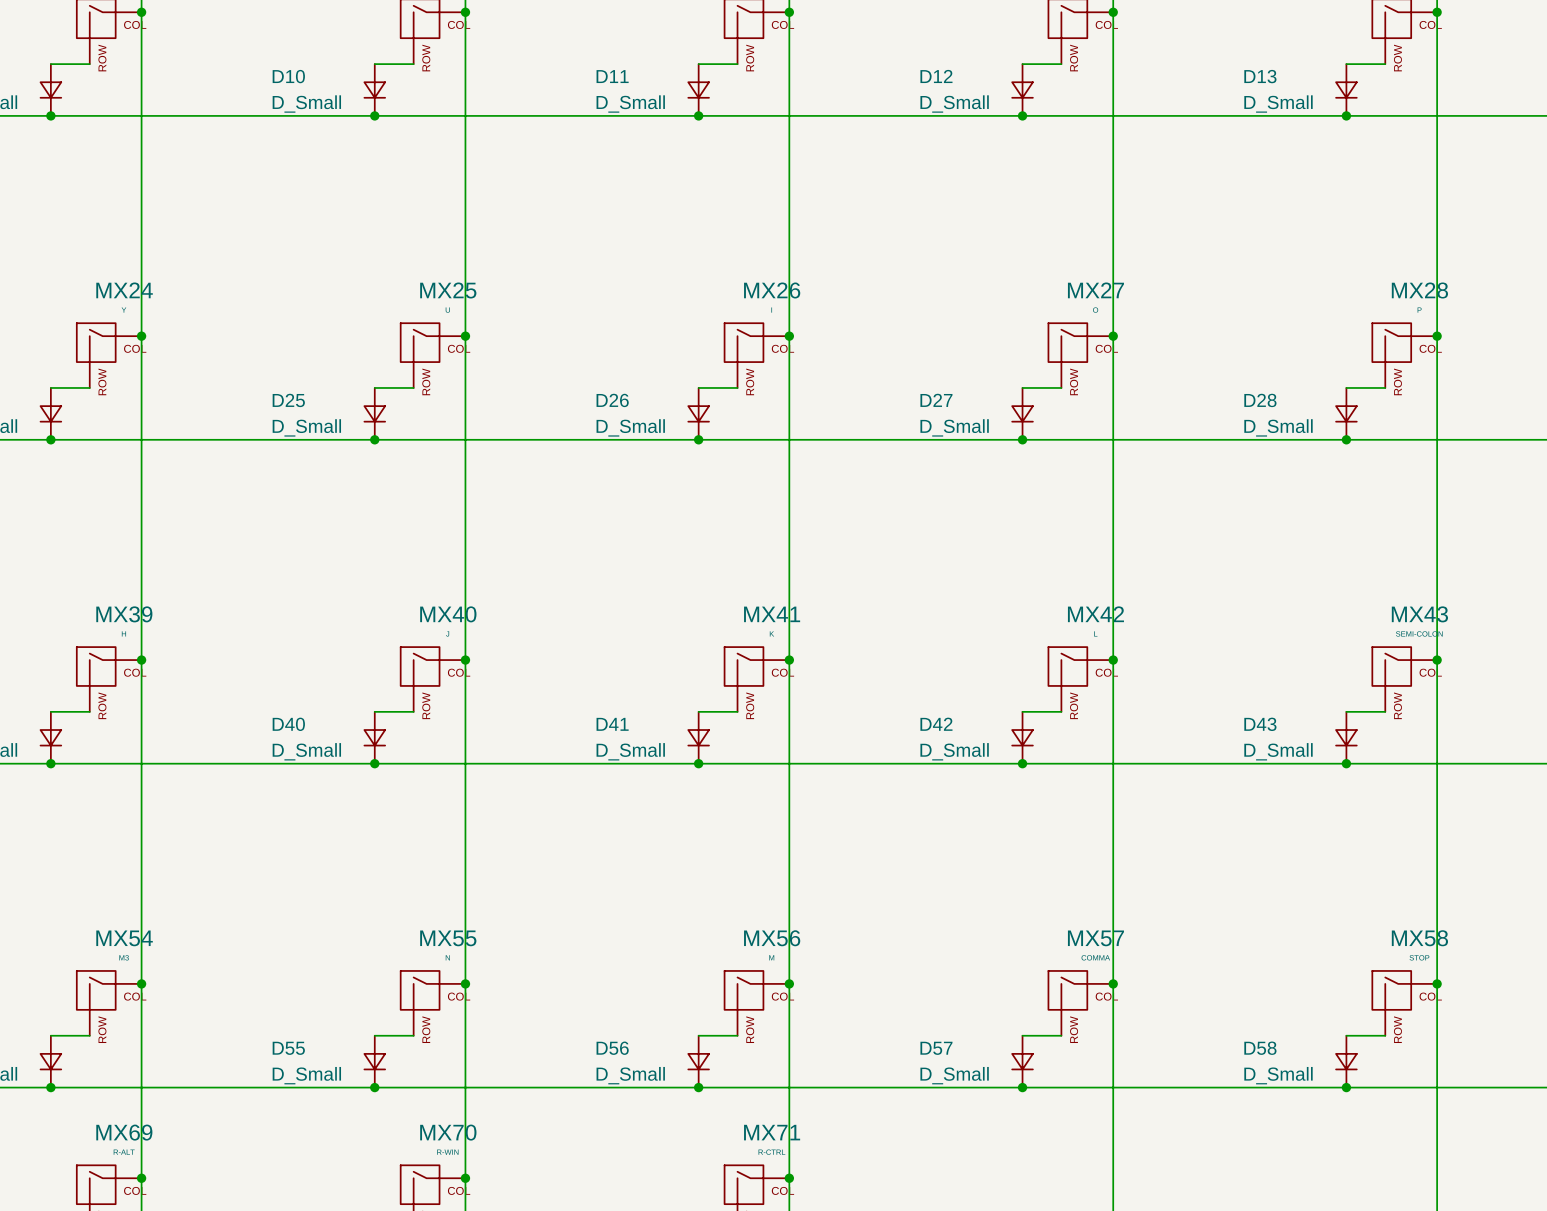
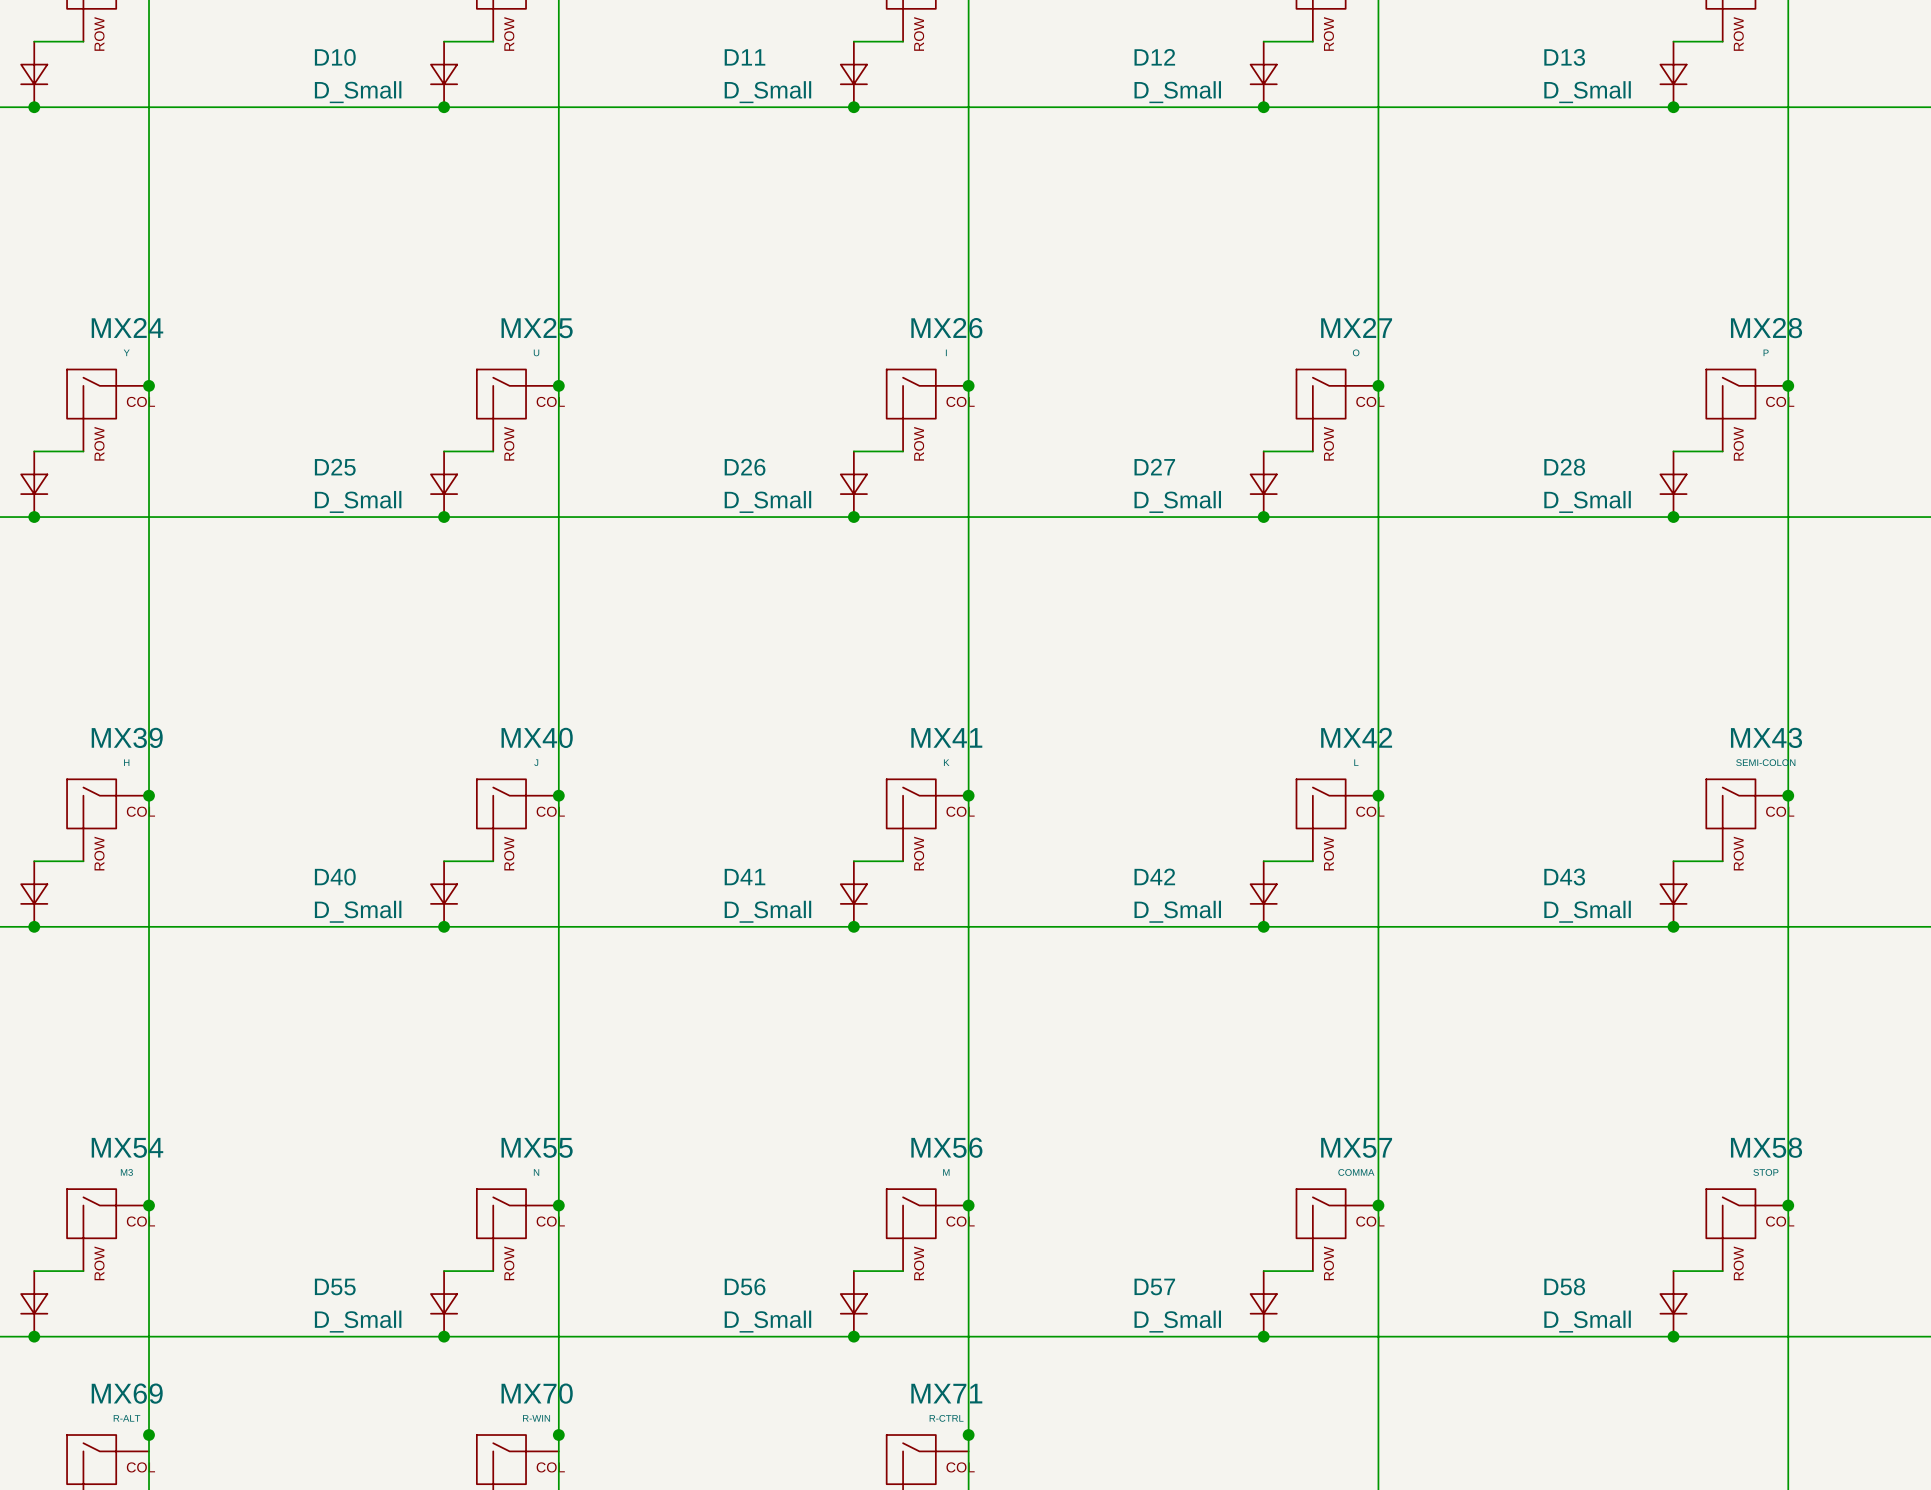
junction position: (141, 1178) -> (149, 1435)
junction position: (465, 1178) -> (558, 1435)
junction position: (789, 1178) -> (968, 1435)

